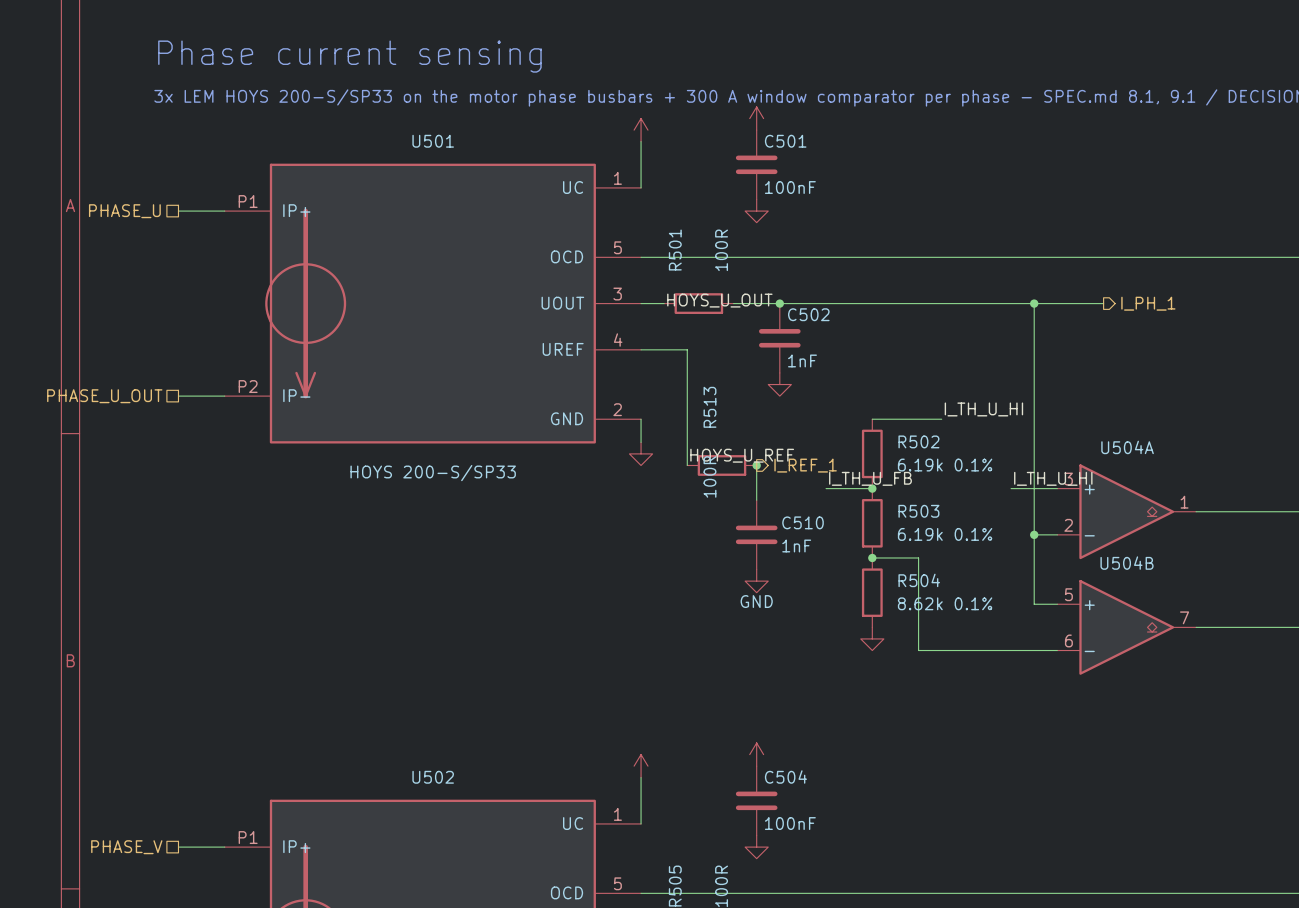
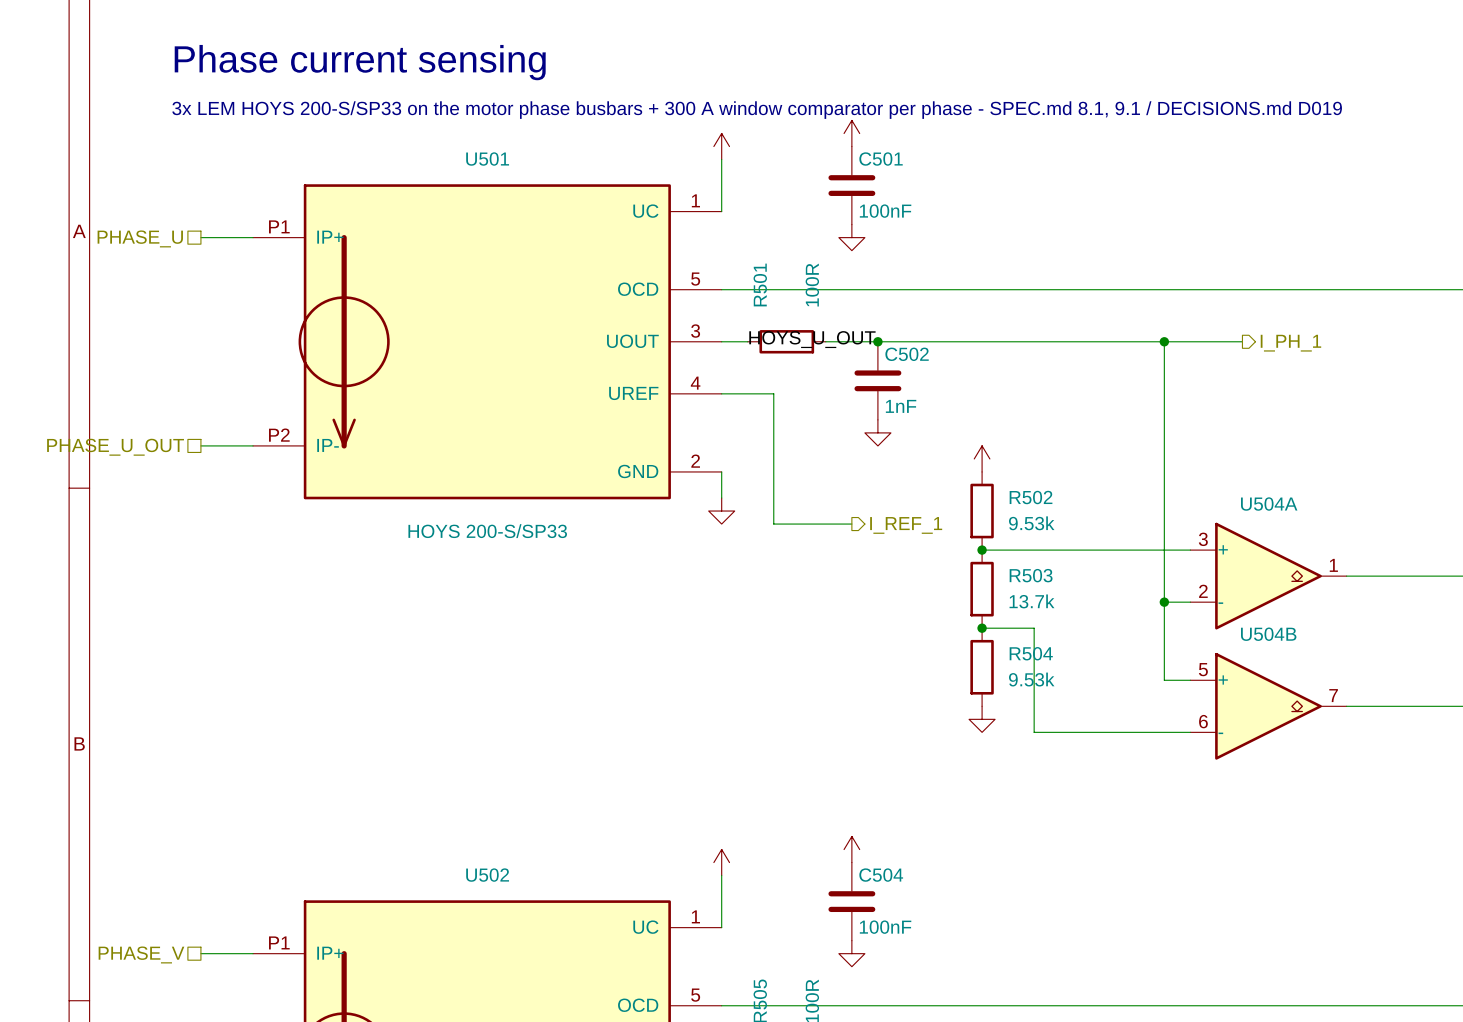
power symbol: none -> (982, 458)
label: I_TH_U_HI (983, 409) -> none
wire: (872, 419) (941, 419) -> none
label: HOYS_U_REF (742, 455) -> none
R513: 100R (721, 465) -> none
wire: (756, 465) (756, 500) -> (851, 524) (773, 524)
junction: (756, 465) -> none
R502 value: 6.19k 0.1% (945, 465) -> 9.53k (1031, 523)
label: I_TH_U_FB (870, 478) -> none
label: I_TH_U_HI (1053, 478) -> none
wire: (826, 488) (872, 488) -> (1138, 550) (982, 550)
C510: 1nF (756, 534) -> none
R503 value: 6.19k 0.1% (945, 534) -> 13.7k (1031, 601)
power symbol: GND (756, 581) -> none
R504 value: 8.62k 0.1% (945, 603) -> 9.53k (1031, 679)

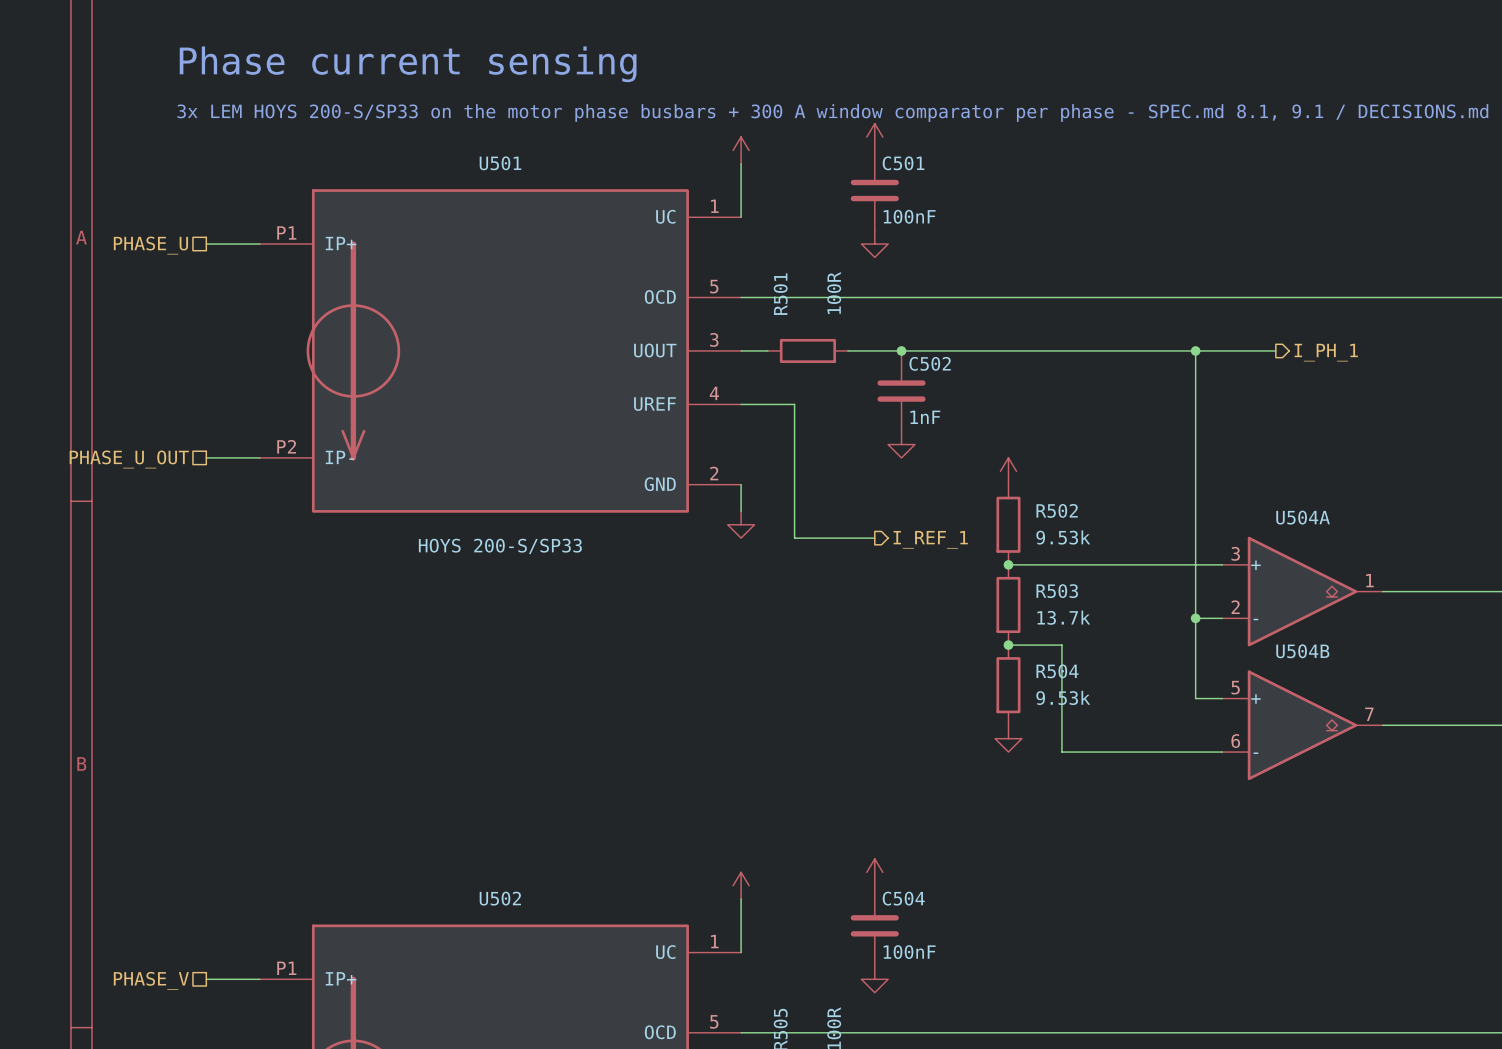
label: HOYS_U_OUT (812, 339) -> none

